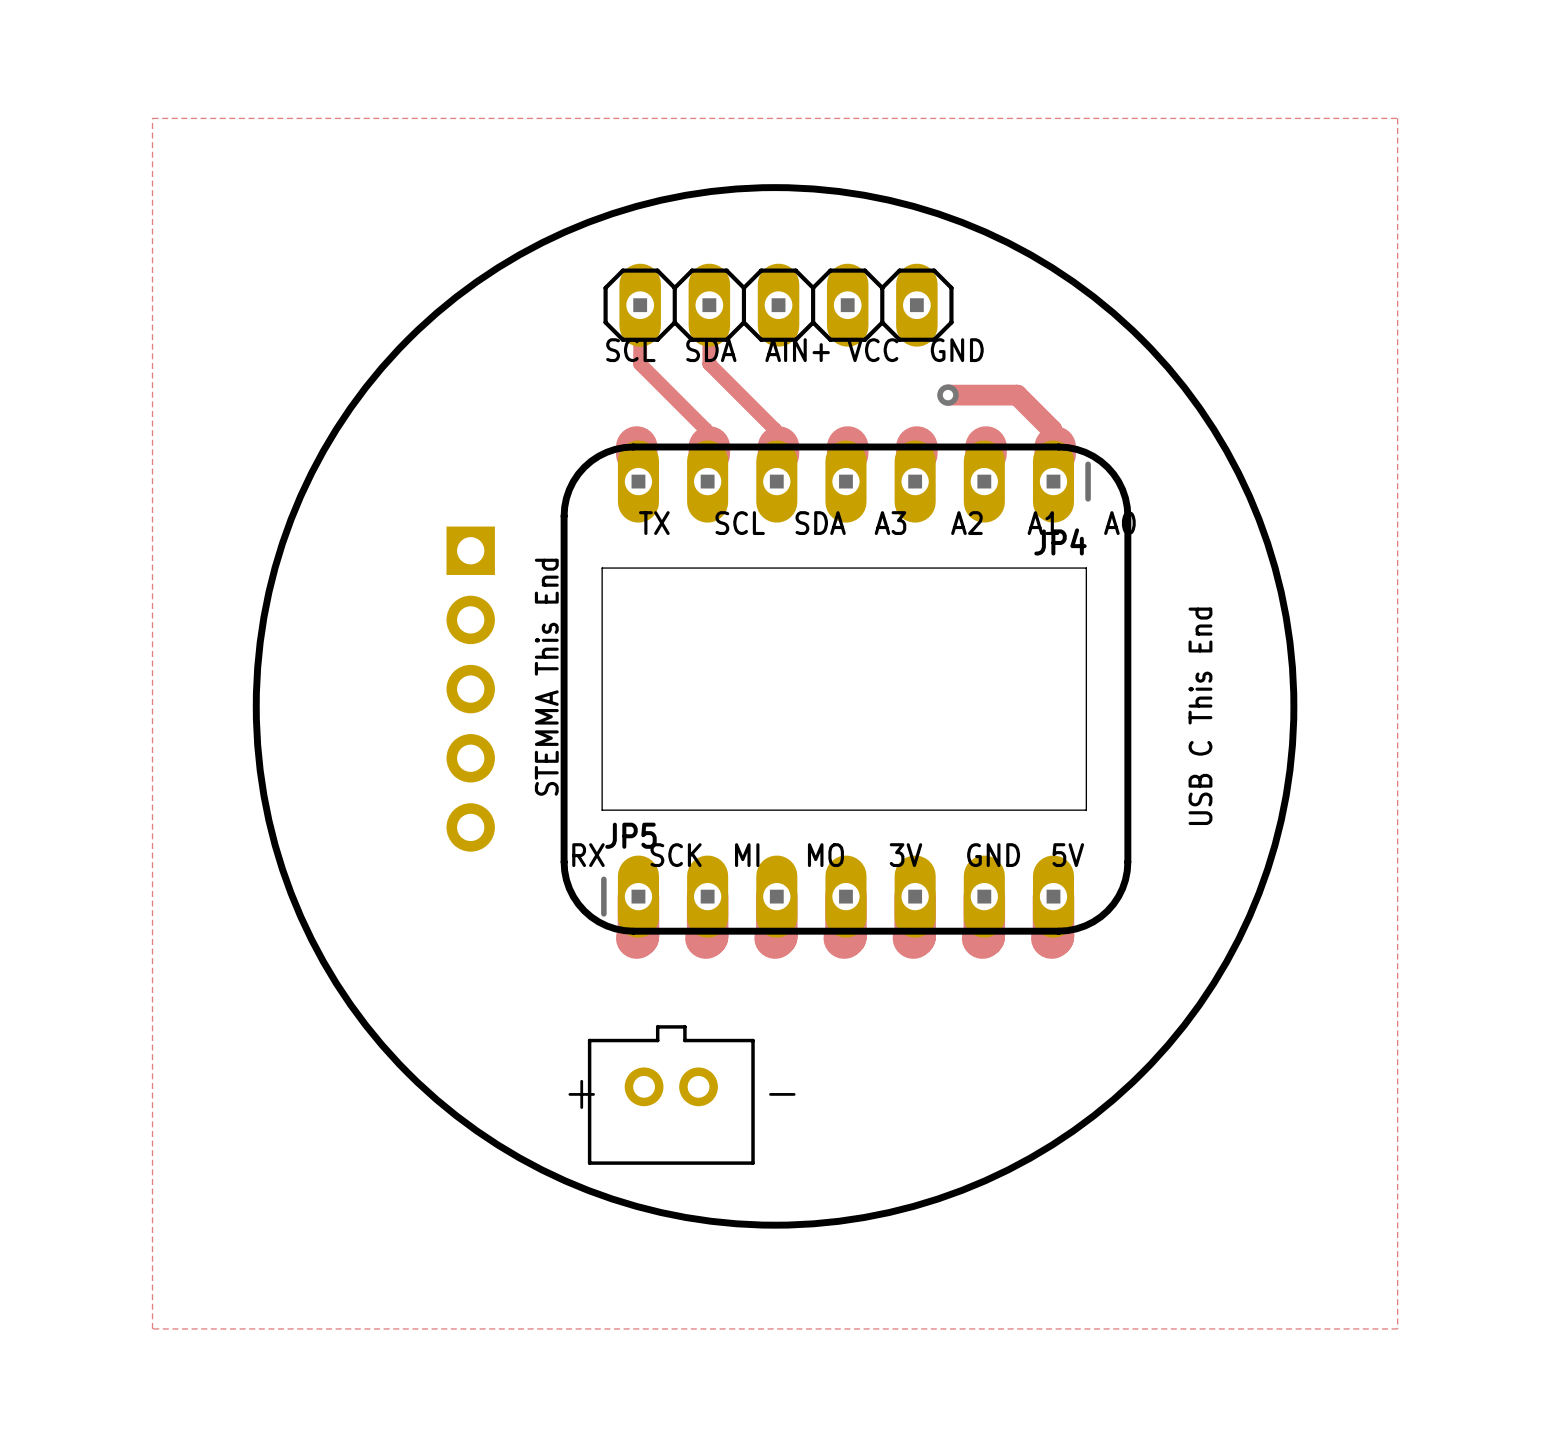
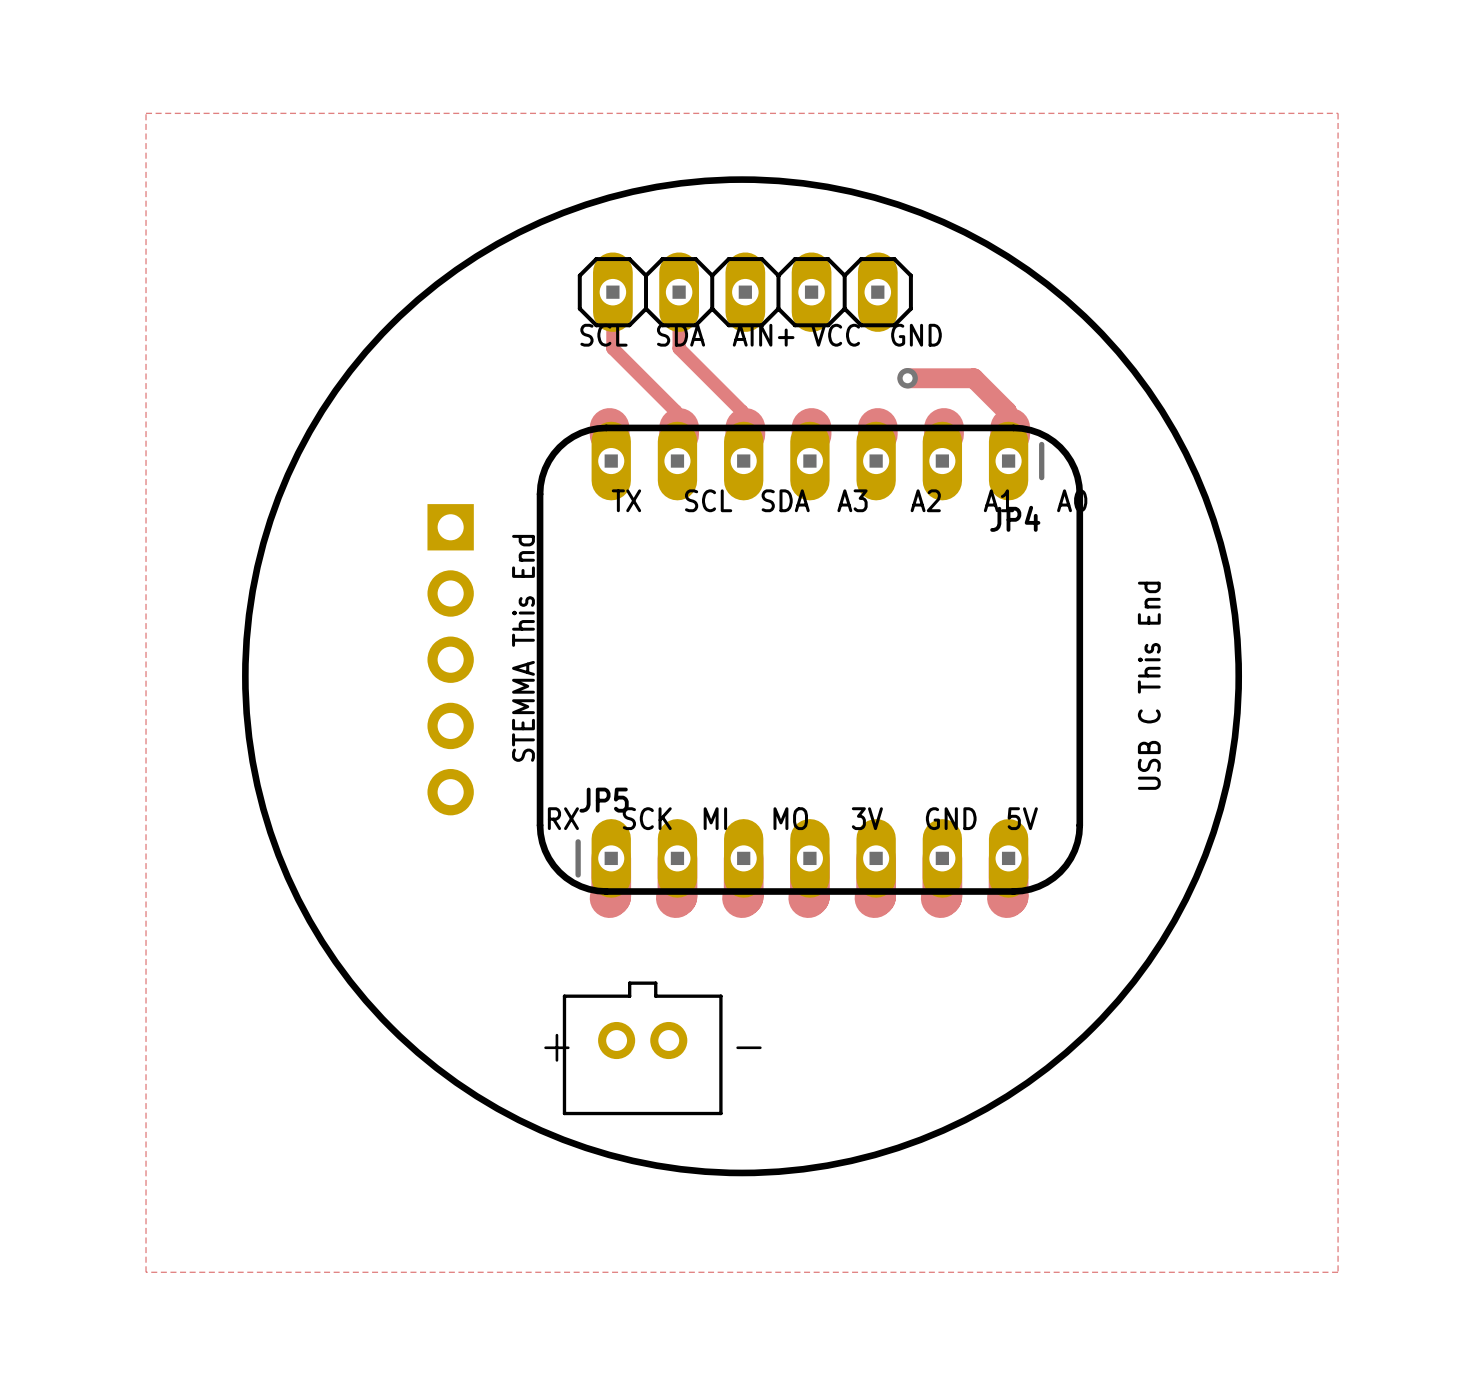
board edge: (602, 568) (1086, 568) (1086, 810) (602, 810) (602, 568) -> none

